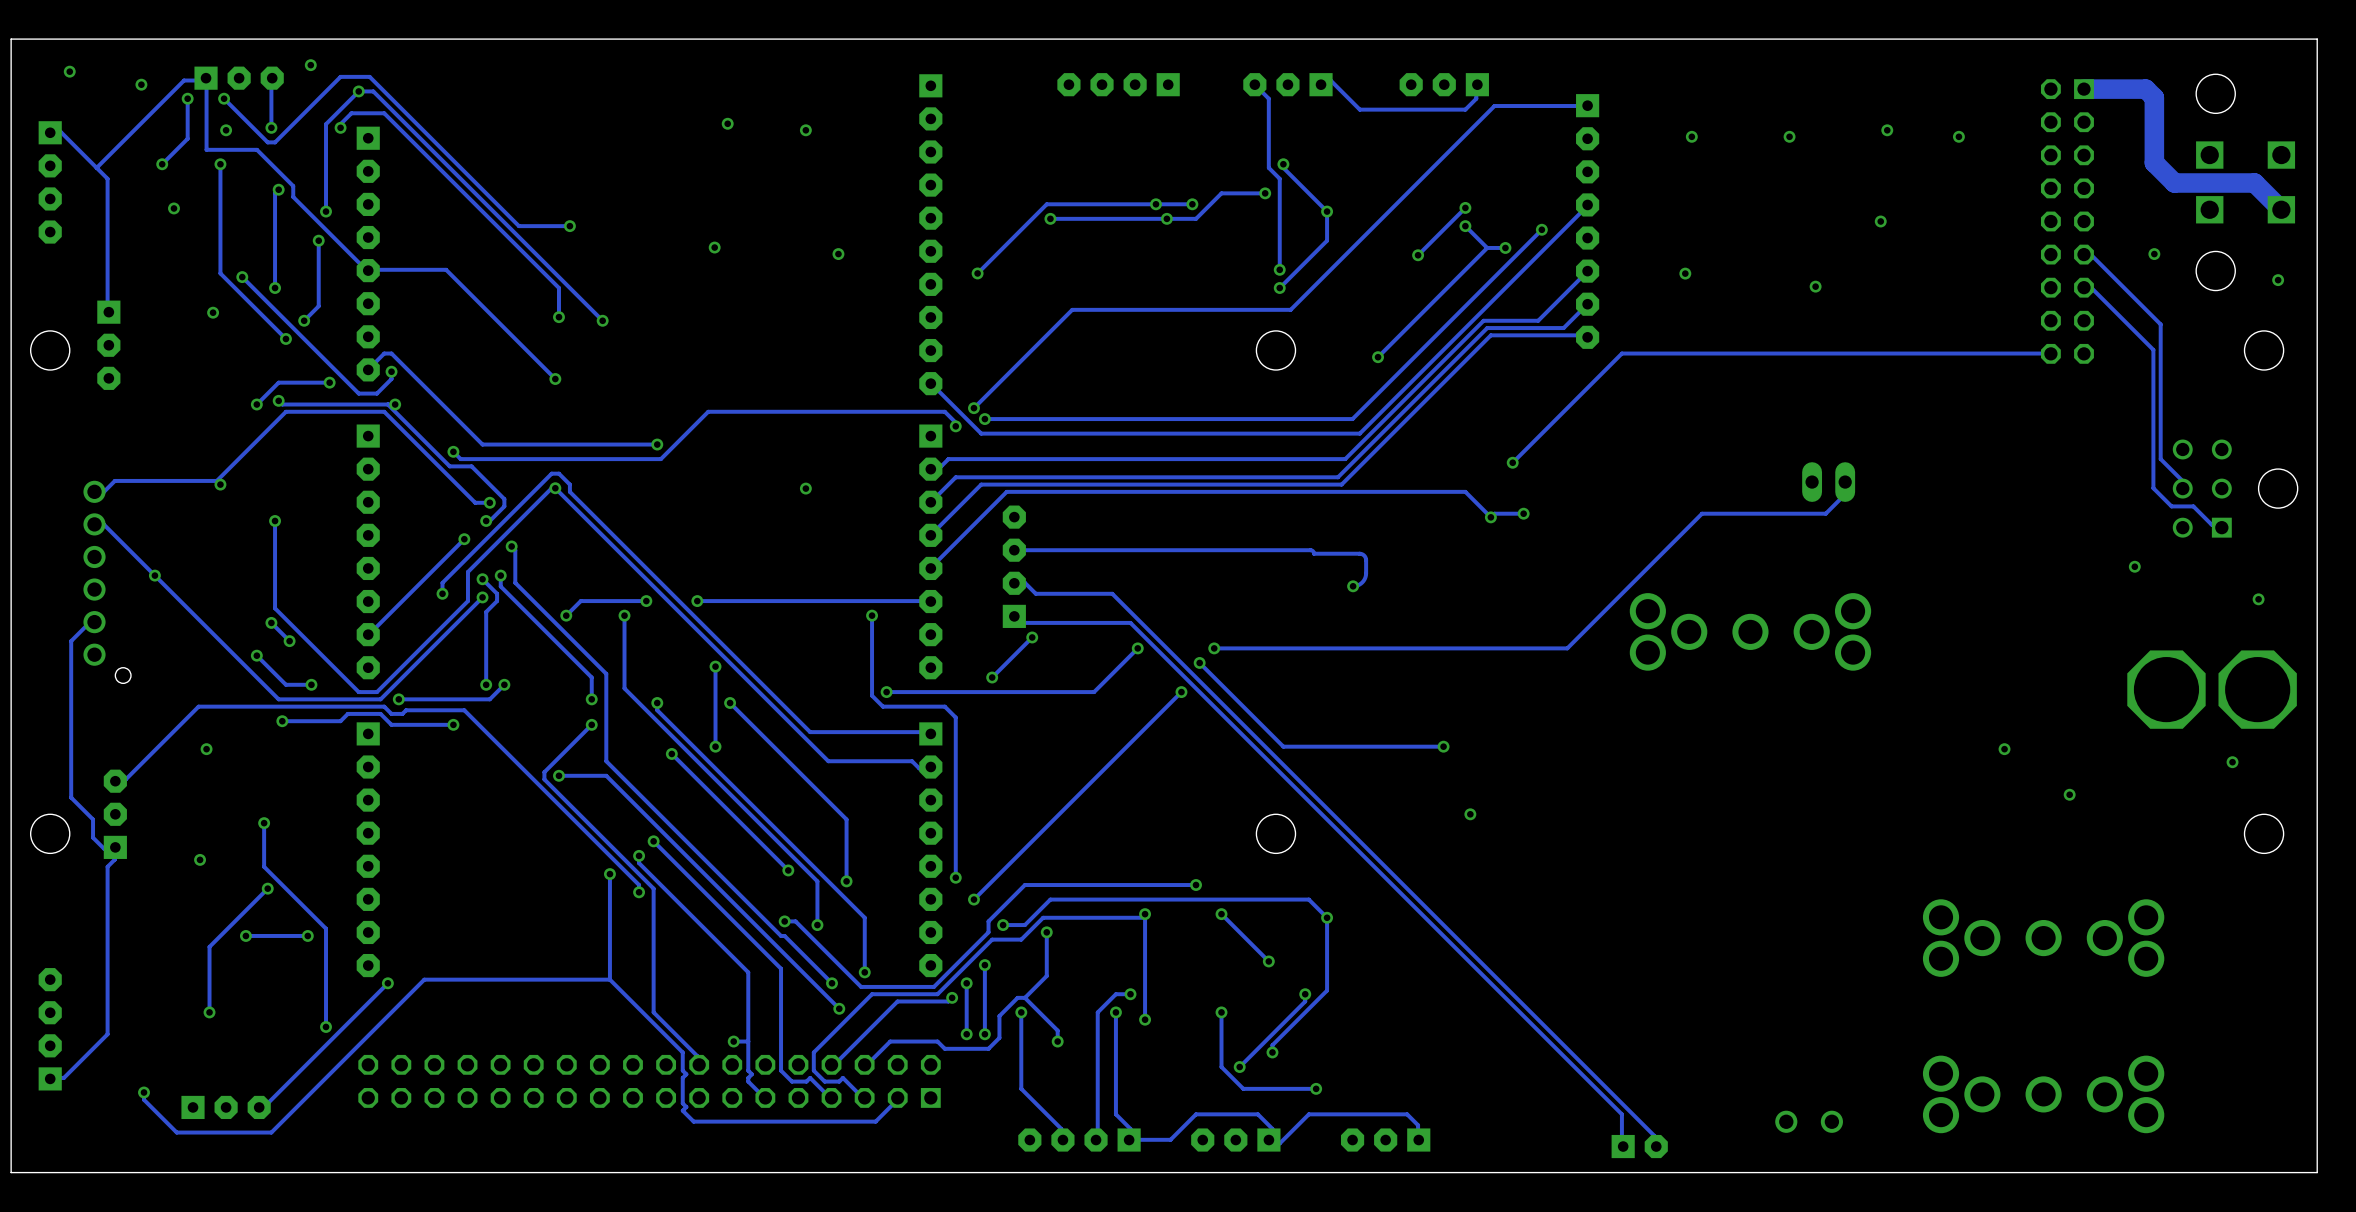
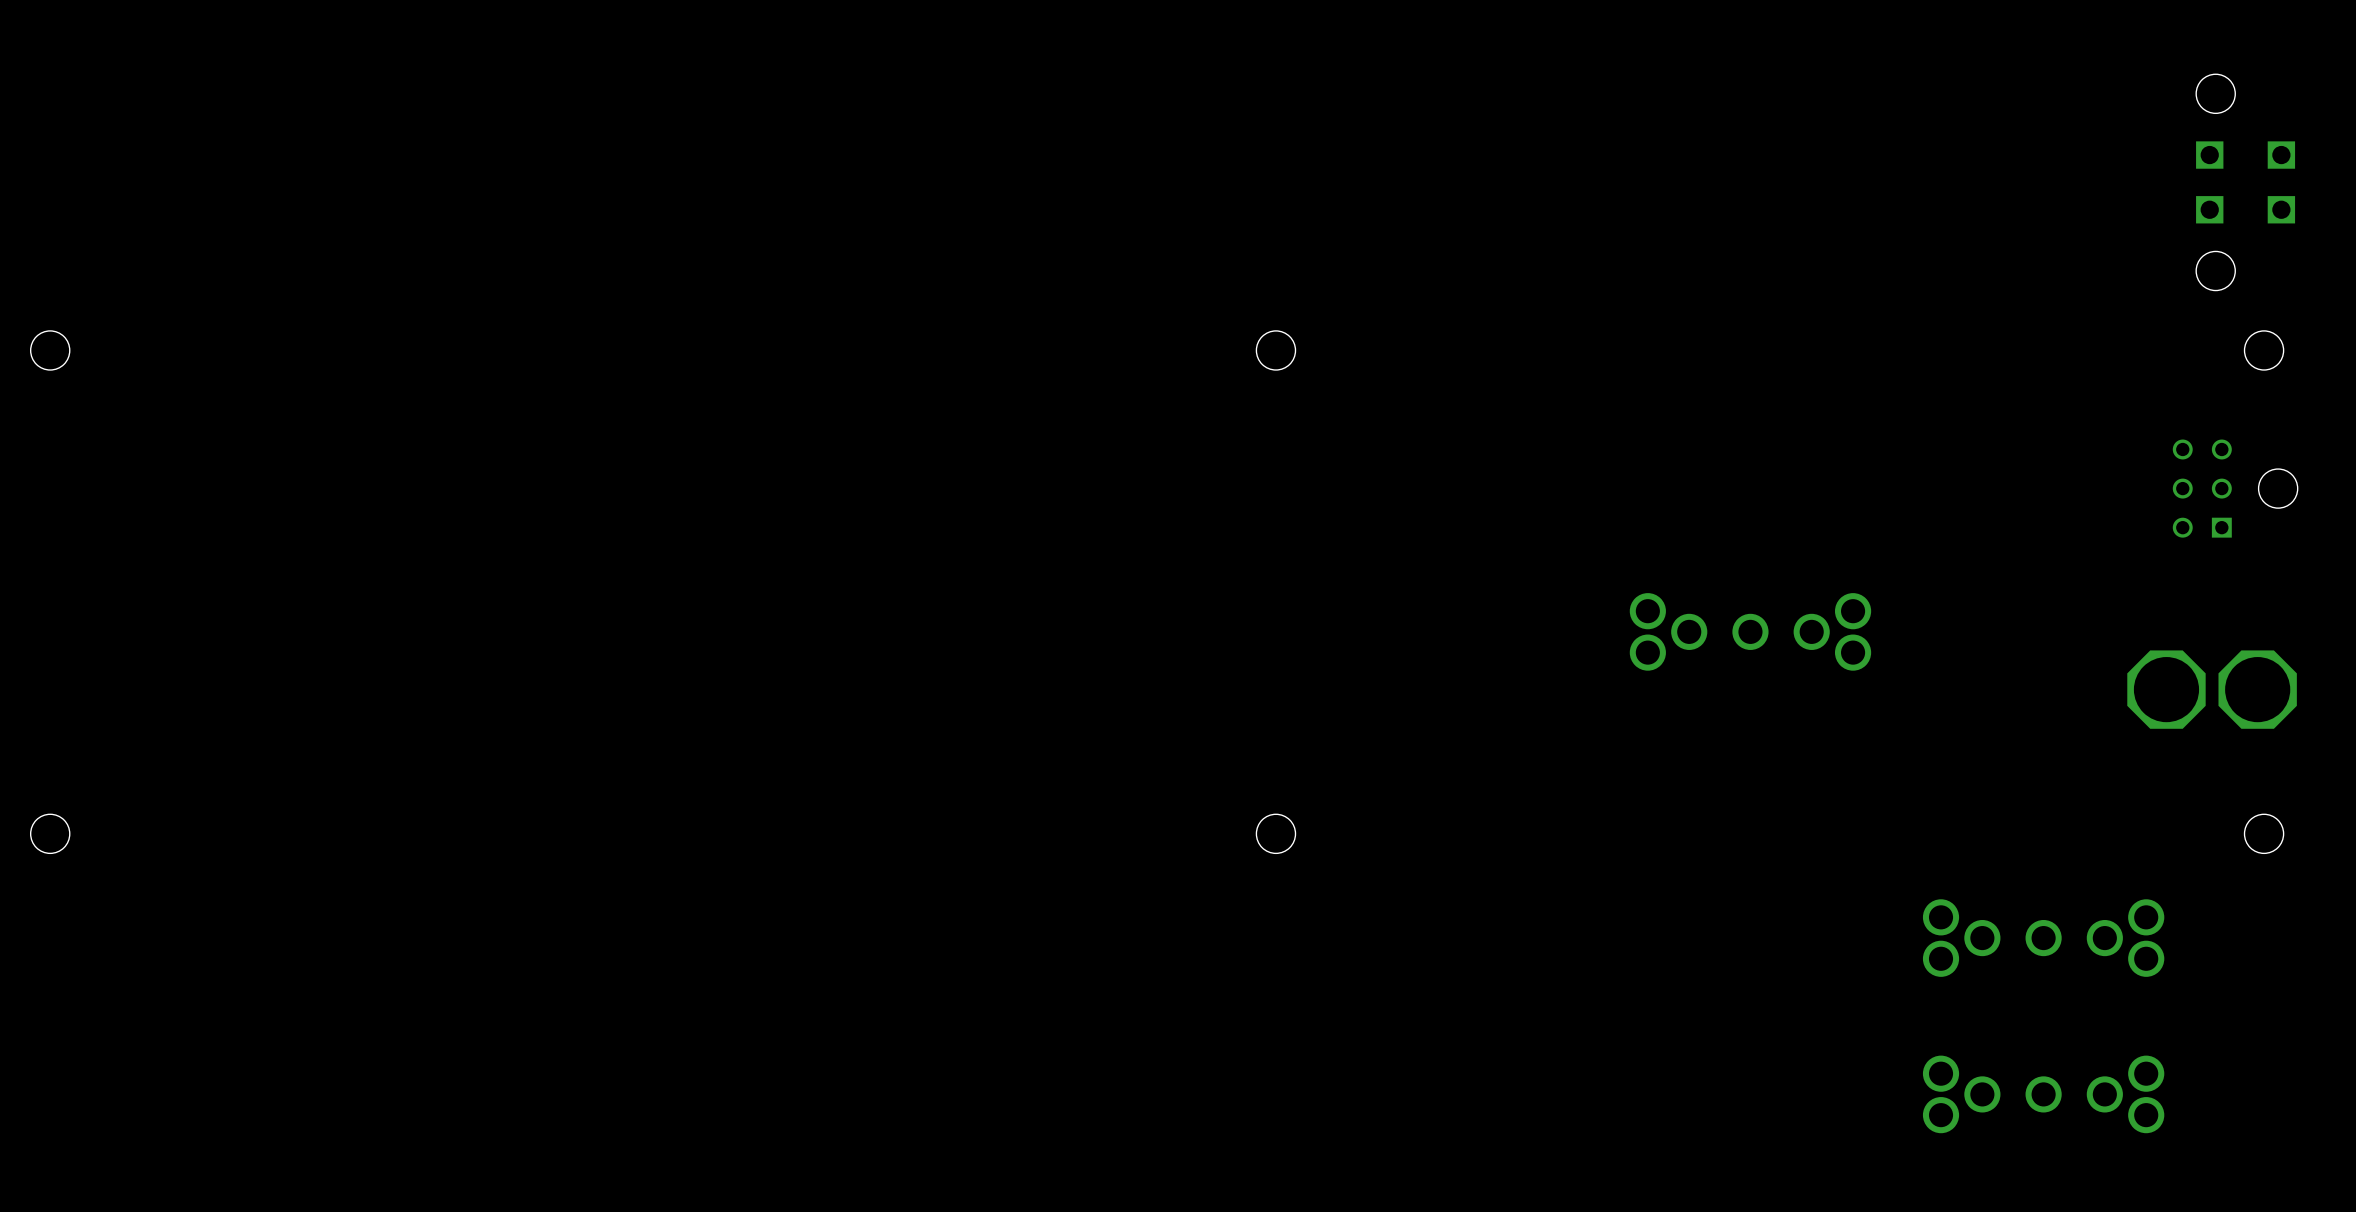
board edge: (2317, 39) (11, 39) (11, 1172) (2317, 1172) (2317, 39) -> none
via: (310, 65) -> none
via: (69, 71) -> none
part: (239, 78) -> none
track: (272, 78) (271, 127) -> none
via: (141, 84) -> none
part: (1118, 84) -> none
track: (1254, 84) (1268, 98) (1268, 167) (1279, 178) (1279, 269) -> none
part: (1287, 84) -> none
part: (1444, 84) -> none
track: (1477, 84) (1476, 98) (1465, 109) (1359, 109) (1330, 80) (1321, 84) -> none
track: (2084, 89) (2145, 89) (2154, 97) (2154, 162) (2174, 183) (2254, 183) (2281, 209) -> none
via: (358, 91) -> none
track: (187, 98) (187, 138) (162, 164) -> none
via: (187, 98) -> none
track: (224, 98) (267, 142) (275, 142) (340, 76) (369, 76) (518, 226) (569, 226) -> none
via: (224, 98) -> none
track: (1587, 105) (1494, 106) (1290, 309) (1072, 309) (973, 408) -> none
via: (727, 123) -> none
via: (271, 127) -> none
track: (340, 127) (340, 124) (351, 113) (384, 113) (558, 288) (558, 317) -> none
via: (340, 127) -> none
via: (226, 130) -> none
via: (805, 130) -> none
via: (1887, 130) -> none
track: (50, 132) (60, 131) (107, 178) (108, 312) -> none
via: (1691, 136) -> none
via: (1789, 136) -> none
via: (1958, 136) -> none
via: (162, 164) -> none
track: (220, 164) (220, 273) (285, 338) -> none
via: (220, 164) -> none
track: (1283, 164) (1283, 167) (1327, 211) (1327, 240) (1279, 288) -> none
via: (1283, 164) -> none
track: (96, 167) (184, 80) (205, 80) (206, 78) (209, 80) (206, 83) (206, 149) (256, 149) (293, 186) (293, 197) (366, 269) (446, 269) (555, 379) -> none
part: (50, 182) -> none
track: (278, 189) (275, 193) (275, 288) -> none
via: (278, 189) -> none
track: (1265, 193) (1221, 193) (1196, 218) (1050, 218) -> none
via: (1265, 193) -> none
via: (1155, 204) -> none
track: (1192, 204) (1046, 204) (977, 273) -> none
via: (1192, 204) -> none
track: (1587, 204) (1359, 433) (981, 433) (930, 383) -> none
track: (1465, 207) (1418, 255) -> none
via: (1465, 207) -> none
via: (173, 208) -> none
track: (326, 211) (326, 124) (358, 91) (373, 91) (602, 320) -> none
via: (326, 211) -> none
via: (1327, 211) -> none
via: (1050, 218) -> none
via: (1166, 218) -> none
part: (1587, 221) -> none
via: (1880, 221) -> none
part: (2067, 221) -> none
via: (569, 226) -> none
track: (1465, 226) (1487, 247) -> none
via: (1465, 226) -> none
track: (1541, 229) (1352, 419) (984, 419) -> none
via: (1541, 229) -> none
part: (930, 234) -> none
track: (318, 240) (318, 306) (304, 320) -> none
via: (318, 240) -> none
via: (714, 247) -> none
track: (1487, 247) (1378, 357) -> none
track: (1505, 247) (1487, 247) -> none
via: (1505, 247) -> none
part: (368, 254) -> none
via: (838, 254) -> none
track: (2084, 254) (2091, 255) (2160, 324) (2160, 459) (2182, 480) (2182, 488) -> none
via: (2154, 254) -> none
via: (1418, 255) -> none
via: (1279, 269) -> none
track: (1587, 271) (1538, 320) (1483, 320) (1345, 459) (948, 459) (941, 466) (933, 466) (930, 469) -> none
via: (977, 273) -> none
via: (1685, 273) -> none
track: (242, 277) (358, 393) (376, 393) (391, 379) (391, 371) -> none
via: (242, 277) -> none
via: (2278, 280) -> none
via: (1815, 286) -> none
track: (2084, 287) (2091, 288) (2153, 349) (2153, 488) (2171, 506) (2193, 506) (2211, 524) (2218, 524) (2221, 527) -> none
via: (275, 288) -> none
via: (1279, 288) -> none
track: (1587, 304) (1563, 328) (1487, 328) (1337, 477) (955, 477) (930, 502) -> none
via: (213, 312) -> none
via: (558, 317) -> none
via: (304, 320) -> none
via: (602, 320) -> none
track: (1587, 337) (1585, 335) (1490, 335) (1341, 484) (981, 484) (937, 528) (933, 528) (930, 531) (930, 535) -> none
via: (285, 338) -> none
part: (108, 345) -> none
track: (2050, 353) (1621, 353) (1512, 462) -> none
via: (1378, 357) -> none
track: (368, 369) (384, 353) (391, 353) (482, 444) (657, 444) -> none
via: (391, 371) -> none
via: (555, 379) -> none
track: (329, 382) (278, 382) (256, 404) -> none
via: (329, 382) -> none
track: (278, 400) (282, 404) (395, 404) -> none
via: (278, 400) -> none
via: (256, 404) -> none
track: (387, 404) (449, 466) (471, 466) (504, 499) (504, 506) (489, 520) (486, 520) -> none
via: (395, 404) -> none
via: (973, 408) -> none
via: (984, 419) -> none
track: (955, 426) (955, 422) (944, 411) (708, 411) (660, 459) (460, 459) (453, 451) -> none
via: (955, 426) -> none
via: (657, 444) -> none
via: (453, 451) -> none
via: (1512, 462) -> none
track: (216, 480) (285, 411) (384, 411) (475, 502) (489, 502) -> none
track: (216, 480) (114, 480) (103, 491) (94, 491) -> none
part: (1828, 482) -> none
track: (1845, 482) (1843, 495) (1825, 513) (1702, 513) (1567, 648) (1214, 648) -> none
via: (220, 484) -> none
via: (555, 488) -> none
via: (805, 488) -> none
via: (489, 502) -> none
track: (1523, 513) (1494, 513) (1490, 517) (1465, 491) (1006, 491) (933, 564) (933, 568) (930, 568) -> none
via: (1523, 513) -> none
via: (1490, 517) -> none
track: (275, 520) (275, 608) (358, 692) (376, 692) (467, 601) (467, 571) (551, 488) (555, 488) (828, 761) (912, 761) (919, 768) (930, 767) -> none
via: (275, 520) -> none
via: (486, 520) -> none
track: (94, 524) (103, 524) (278, 699) (380, 699) (482, 597) -> none
track: (464, 539) (368, 634) -> none
via: (464, 539) -> none
track: (511, 546) (515, 550) (515, 582) (606, 673) (606, 761) (781, 935) (784, 935) (832, 983) -> none
via: (511, 546) -> none
track: (1014, 550) (1310, 550) (1314, 553) (1361, 553) (1366, 559) (1365, 576) (1361, 583) (1353, 586) -> none
part: (368, 551) -> none
part: (930, 551) -> none
part: (1014, 566) -> none
via: (2134, 566) -> none
via: (154, 575) -> none
track: (500, 575) (500, 586) (591, 677) (591, 699) -> none
via: (500, 575) -> none
track: (482, 579) (497, 593) (497, 601) (486, 611) (486, 684) -> none
via: (482, 579) -> none
part: (107, 582) -> none
track: (1014, 583) (1024, 582) (1035, 593) (1112, 593) (1654, 1136) (1656, 1146) -> none
via: (1353, 586) -> none
track: (442, 593) (442, 582) (551, 473) (558, 473) (569, 484) (569, 491) (810, 732) (930, 732) (930, 733) -> none
via: (442, 593) -> none
via: (482, 597) -> none
via: (2258, 599) -> none
track: (646, 601) (580, 601) (566, 615) -> none
via: (646, 601) -> none
track: (697, 601) (930, 601) -> none
via: (697, 601) -> none
via: (566, 615) -> none
track: (624, 615) (624, 688) (817, 881) (817, 925) -> none
via: (624, 615) -> none
track: (872, 615) (872, 695) (882, 706) (944, 706) (955, 717) (955, 877) -> none
via: (872, 615) -> none
track: (1014, 616) (1021, 622) (1130, 622) (1621, 1114) (1623, 1146) -> none
track: (94, 622) (89, 622) (71, 641) (71, 797) (93, 819) (93, 837) (103, 848) (114, 848) -> none
track: (271, 622) (289, 641) -> none
via: (271, 622) -> none
track: (1032, 637) (992, 677) -> none
via: (1032, 637) -> none
via: (289, 641) -> none
track: (1137, 648) (1094, 692) (886, 692) -> none
via: (1137, 648) -> none
via: (1214, 648) -> none
track: (256, 655) (285, 684) (311, 684) -> none
via: (256, 655) -> none
track: (1199, 662) (1283, 746) (1443, 746) -> none
via: (1199, 662) -> none
track: (715, 666) (715, 746) -> none
via: (715, 666) -> none
via: (992, 677) -> none
via: (311, 684) -> none
via: (486, 684) -> none
track: (504, 684) (489, 699) (398, 699) -> none
via: (504, 684) -> none
via: (886, 692) -> none
track: (1181, 692) (973, 899) -> none
via: (1181, 692) -> none
via: (398, 699) -> none
via: (591, 699) -> none
track: (657, 703) (657, 710) (864, 917) (864, 972) -> none
via: (657, 703) -> none
track: (730, 703) (846, 819) (846, 881) -> none
via: (730, 703) -> none
track: (282, 721) (340, 721) (347, 713) (380, 713) (391, 724) (453, 724) -> none
via: (282, 721) -> none
via: (453, 724) -> none
track: (591, 724) (544, 772) (544, 779) (653, 888) (653, 1012) (697, 1056) (697, 1063) (699, 1064) -> none
via: (591, 724) -> none
via: (715, 746) -> none
via: (1443, 746) -> none
via: (206, 749) -> none
via: (2004, 749) -> none
track: (671, 753) (788, 870) -> none
via: (671, 753) -> none
via: (2232, 762) -> none
track: (558, 775) (606, 775) (839, 1008) -> none
via: (558, 775) -> none
track: (115, 781) (125, 779) (198, 706) (384, 706) (391, 713) (402, 713) (406, 710) (464, 710) (639, 885) (639, 892) -> none
via: (2069, 794) -> none
part: (115, 814) -> none
via: (1470, 814) -> none
track: (264, 823) (264, 866) (326, 928) (326, 1026) -> none
via: (264, 823) -> none
track: (653, 841) (781, 968) (781, 1070) (791, 1081) (806, 1081) (810, 1077) (831, 1097) -> none
via: (653, 841) -> none
track: (114, 848) (114, 859) (107, 866) (107, 1034) (63, 1077) (50, 1078) -> none
part: (368, 849) -> none
part: (930, 849) -> none
track: (639, 855) (639, 863) (748, 972) (748, 1070) (751, 1074) (748, 1077) (748, 1081) (759, 1092) (762, 1092) (766, 1096) (765, 1097) -> none
via: (639, 855) -> none
via: (200, 859) -> none
via: (788, 870) -> none
track: (609, 874) (609, 979) -> none
via: (609, 874) -> none
via: (955, 877) -> none
via: (846, 881) -> none
track: (1196, 885) (1024, 885) (988, 921) (988, 932) (933, 986) (861, 986) (795, 921) (784, 921) -> none
via: (1196, 885) -> none
track: (267, 888) (209, 946) (209, 1012) -> none
via: (267, 888) -> none
via: (639, 892) -> none
via: (973, 899) -> none
track: (1145, 914) (1145, 1019) -> none
via: (1145, 914) -> none
track: (1221, 914) (1268, 961) -> none
via: (1221, 914) -> none
track: (1145, 917) (1043, 917) (1021, 939) (992, 939) (937, 994) (872, 994) (813, 1052) (813, 1070) (824, 1081) (839, 1081) (842, 1077) (864, 1097) -> none
via: (1327, 917) -> none
via: (784, 921) -> none
via: (817, 925) -> none
track: (1003, 925) (1024, 925) (1050, 899) (1308, 899) (1327, 917) (1327, 990) (1272, 1045) (1272, 1052) -> none
via: (1003, 925) -> none
track: (1046, 932) (1046, 976) (1024, 997) -> none
via: (1046, 932) -> none
via: (245, 935) -> none
track: (307, 935) (245, 935) -> none
via: (307, 935) -> none
via: (1268, 961) -> none
track: (984, 965) (984, 1034) -> none
via: (984, 965) -> none
via: (864, 972) -> none
track: (609, 979) (682, 1052) (682, 1070) (686, 1074) (682, 1077) (682, 1103) (686, 1107) (682, 1110) (693, 1121) (875, 1121) (897, 1097) -> none
track: (609, 979) (424, 979) (271, 1132) (176, 1132) (144, 1099) (144, 1092) -> none
track: (387, 983) (260, 1110) (259, 1107) -> none
via: (387, 983) -> none
via: (832, 983) -> none
track: (966, 983) (966, 1034) -> none
via: (966, 983) -> none
track: (1130, 994) (1115, 994) (1097, 1012) (1097, 1139) (1096, 1140) -> none
via: (1130, 994) -> none
track: (1305, 994) (1305, 1001) (1239, 1067) -> none
via: (1305, 994) -> none
track: (952, 997) (948, 1001) (897, 1001) (835, 1063) (831, 1064) -> none
via: (952, 997) -> none
track: (1024, 997) (1057, 1030) (1057, 1041) -> none
track: (1024, 997) (1017, 997) (999, 1016) (999, 1037) (988, 1048) (944, 1048) (937, 1041) (890, 1041) (864, 1067) (864, 1064) -> none
via: (839, 1008) -> none
via: (209, 1012) -> none
track: (1021, 1012) (1021, 1088) (1061, 1128) (1061, 1139) (1062, 1140) -> none
via: (1021, 1012) -> none
track: (1115, 1012) (1115, 1114) (1130, 1128) (1130, 1139) -> none
via: (1115, 1012) -> none
track: (1221, 1012) (1221, 1067) (1243, 1088) (1316, 1088) -> none
via: (1221, 1012) -> none
via: (1145, 1019) -> none
via: (326, 1026) -> none
part: (50, 1029) -> none
via: (966, 1034) -> none
via: (984, 1034) -> none
via: (733, 1041) -> none
track: (748, 1041) (733, 1041) -> none
via: (1057, 1041) -> none
via: (1272, 1052) -> none
via: (1239, 1067) -> none
part: (649, 1081) -> none
via: (1316, 1088) -> none
via: (144, 1092) -> none
part: (226, 1107) -> none
part: (1809, 1121) -> none
track: (1130, 1139) (1170, 1139) (1196, 1114) (1257, 1114) (1272, 1128) (1272, 1139) (1268, 1140) (1272, 1143) (1279, 1143) (1308, 1114) (1407, 1114) (1418, 1125) (1418, 1140) -> none
part: (1079, 1140) -> none
part: (1235, 1140) -> none
part: (1385, 1140) -> none
part: (1639, 1146) -> none

